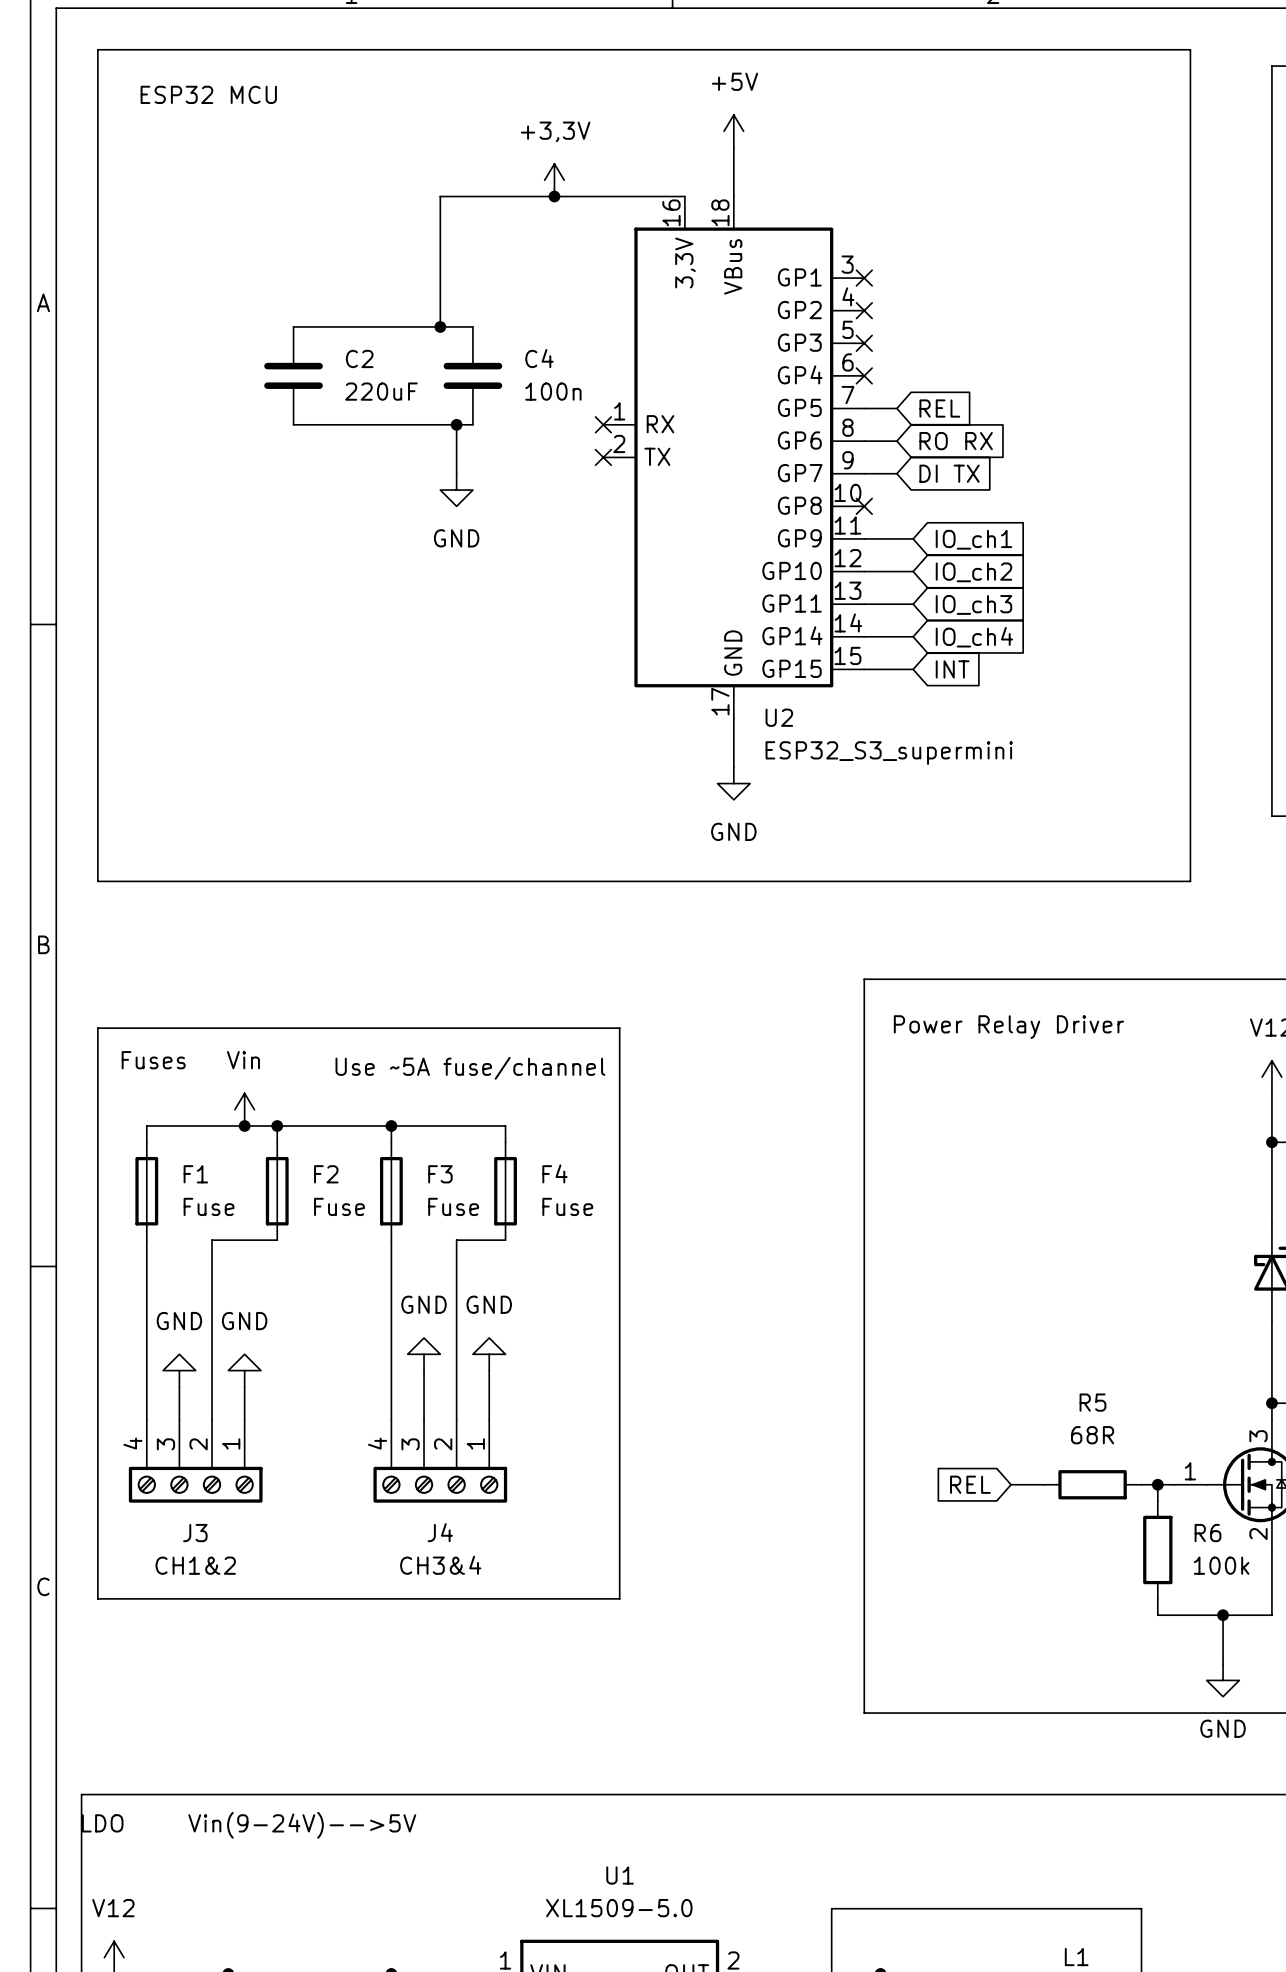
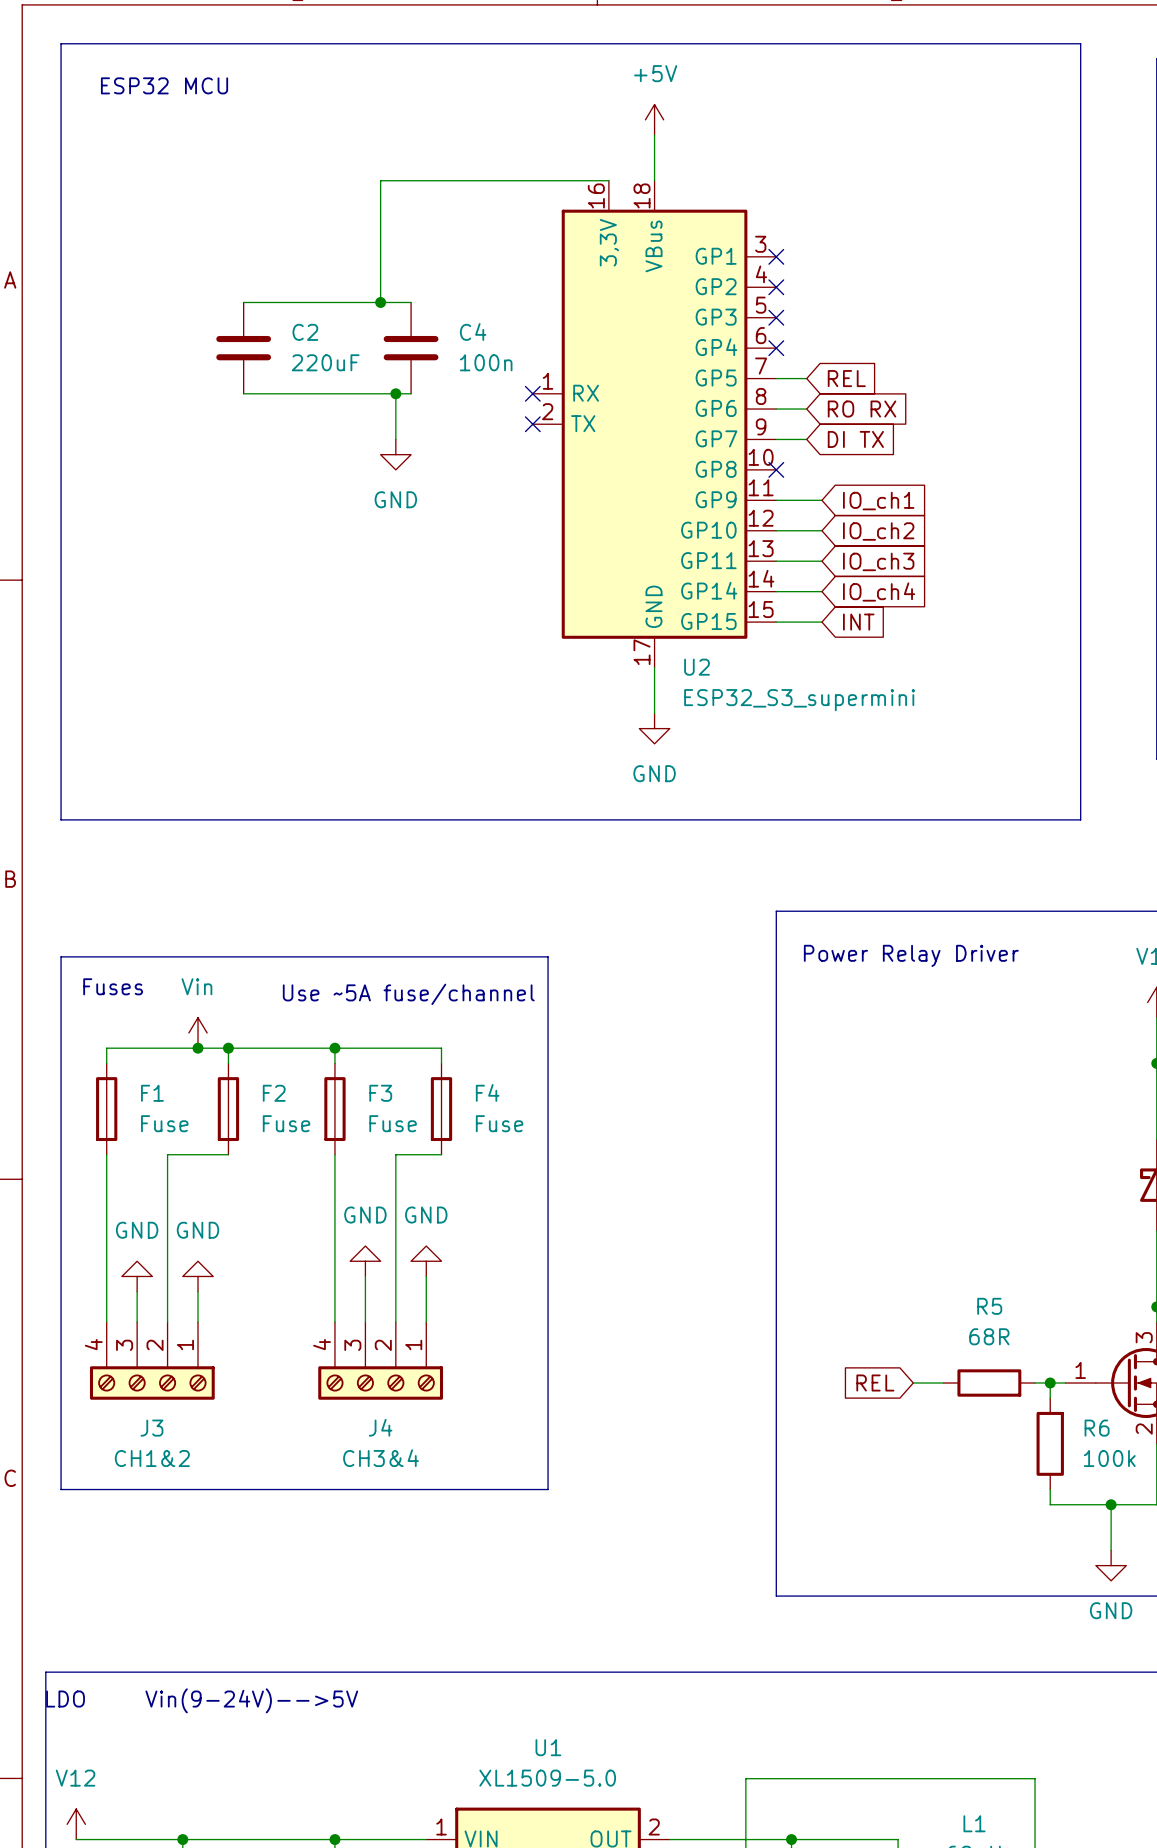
power symbol: +3,3V (554, 180) -> none
junction: (554, 196) -> none

